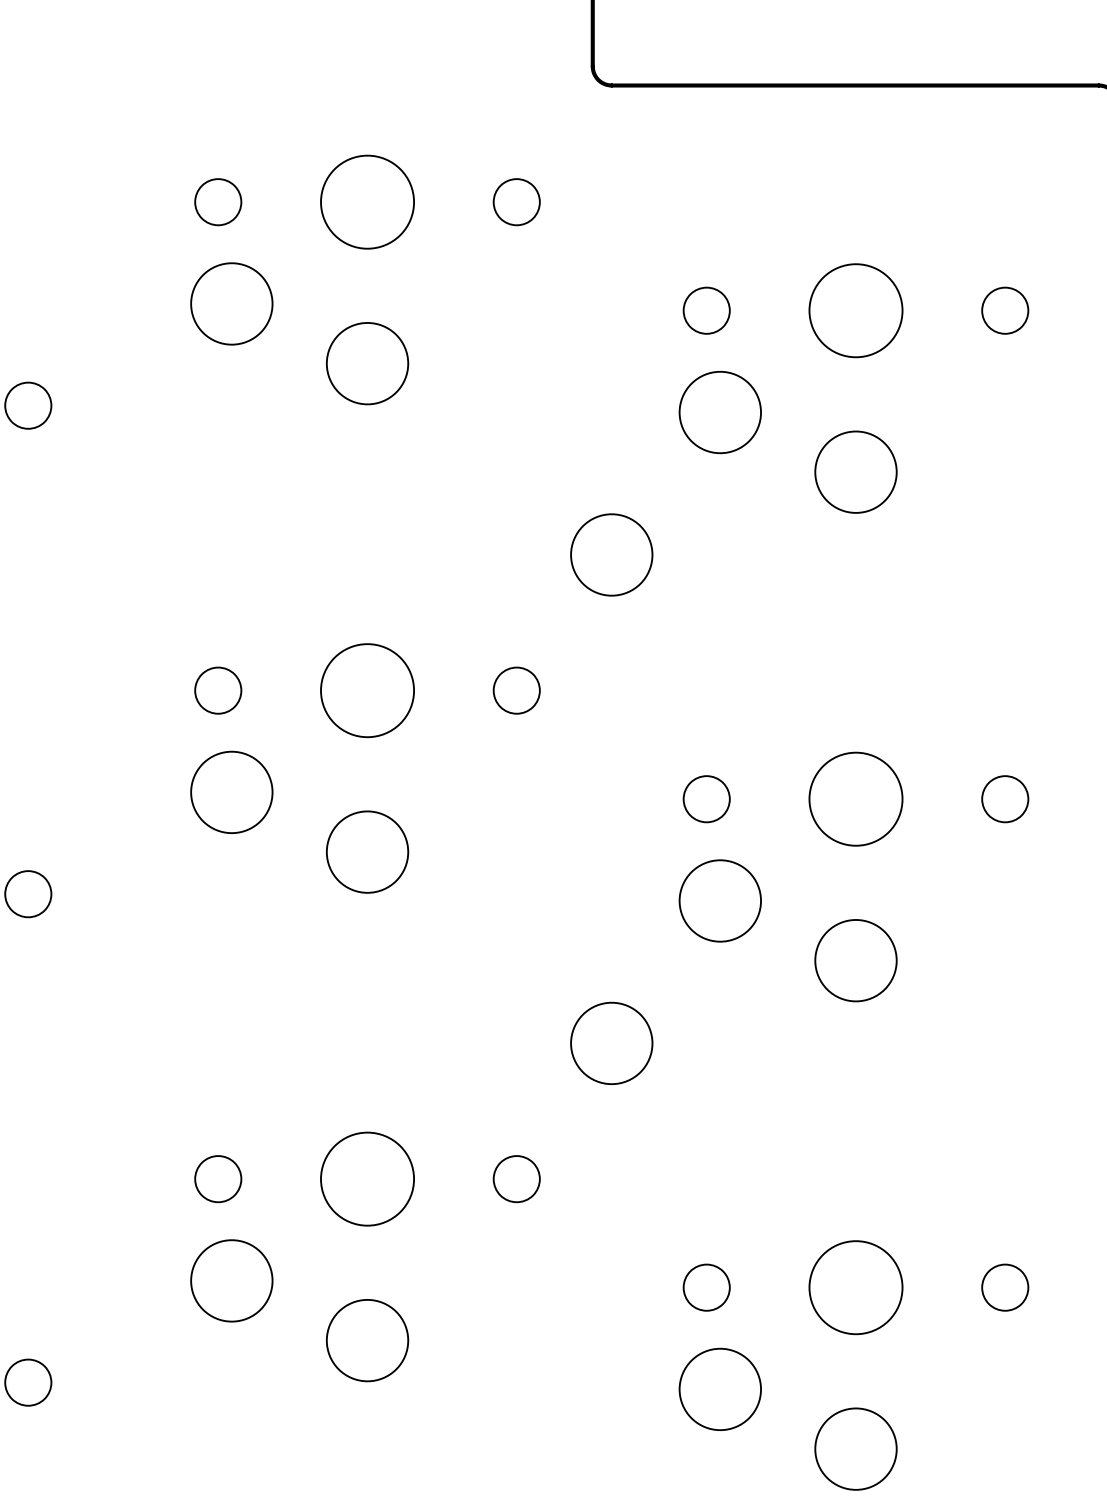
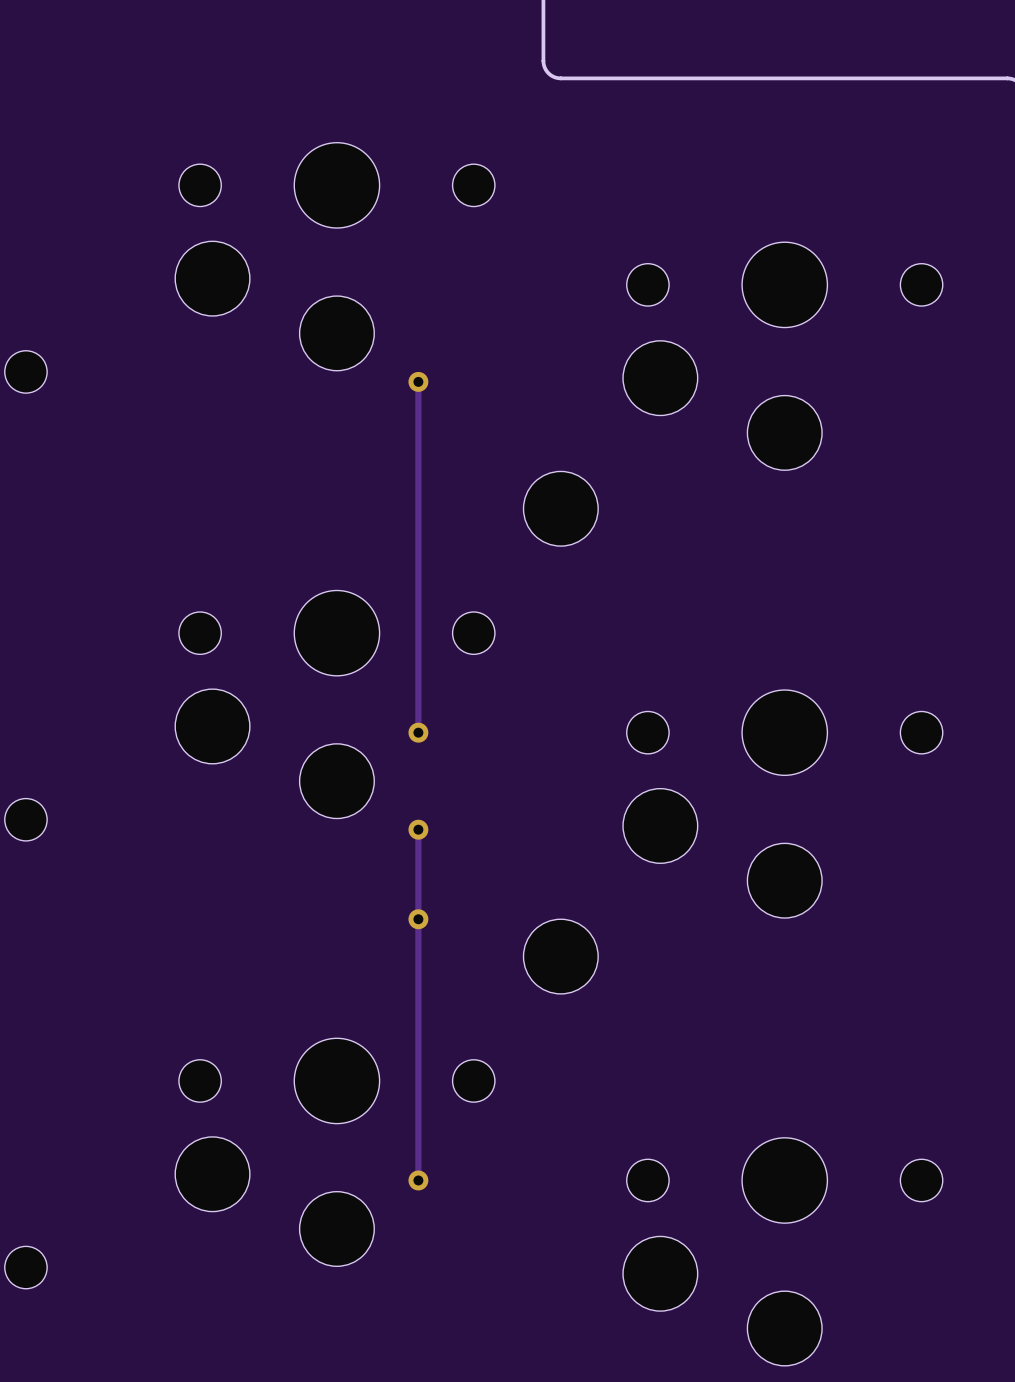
track: none -> (418, 381) (418, 732)
via: none -> (418, 381)
via: none -> (418, 732)
track: none -> (418, 829) (418, 1180)
via: none -> (418, 829)
via: none -> (418, 919)
via: none -> (418, 1180)

